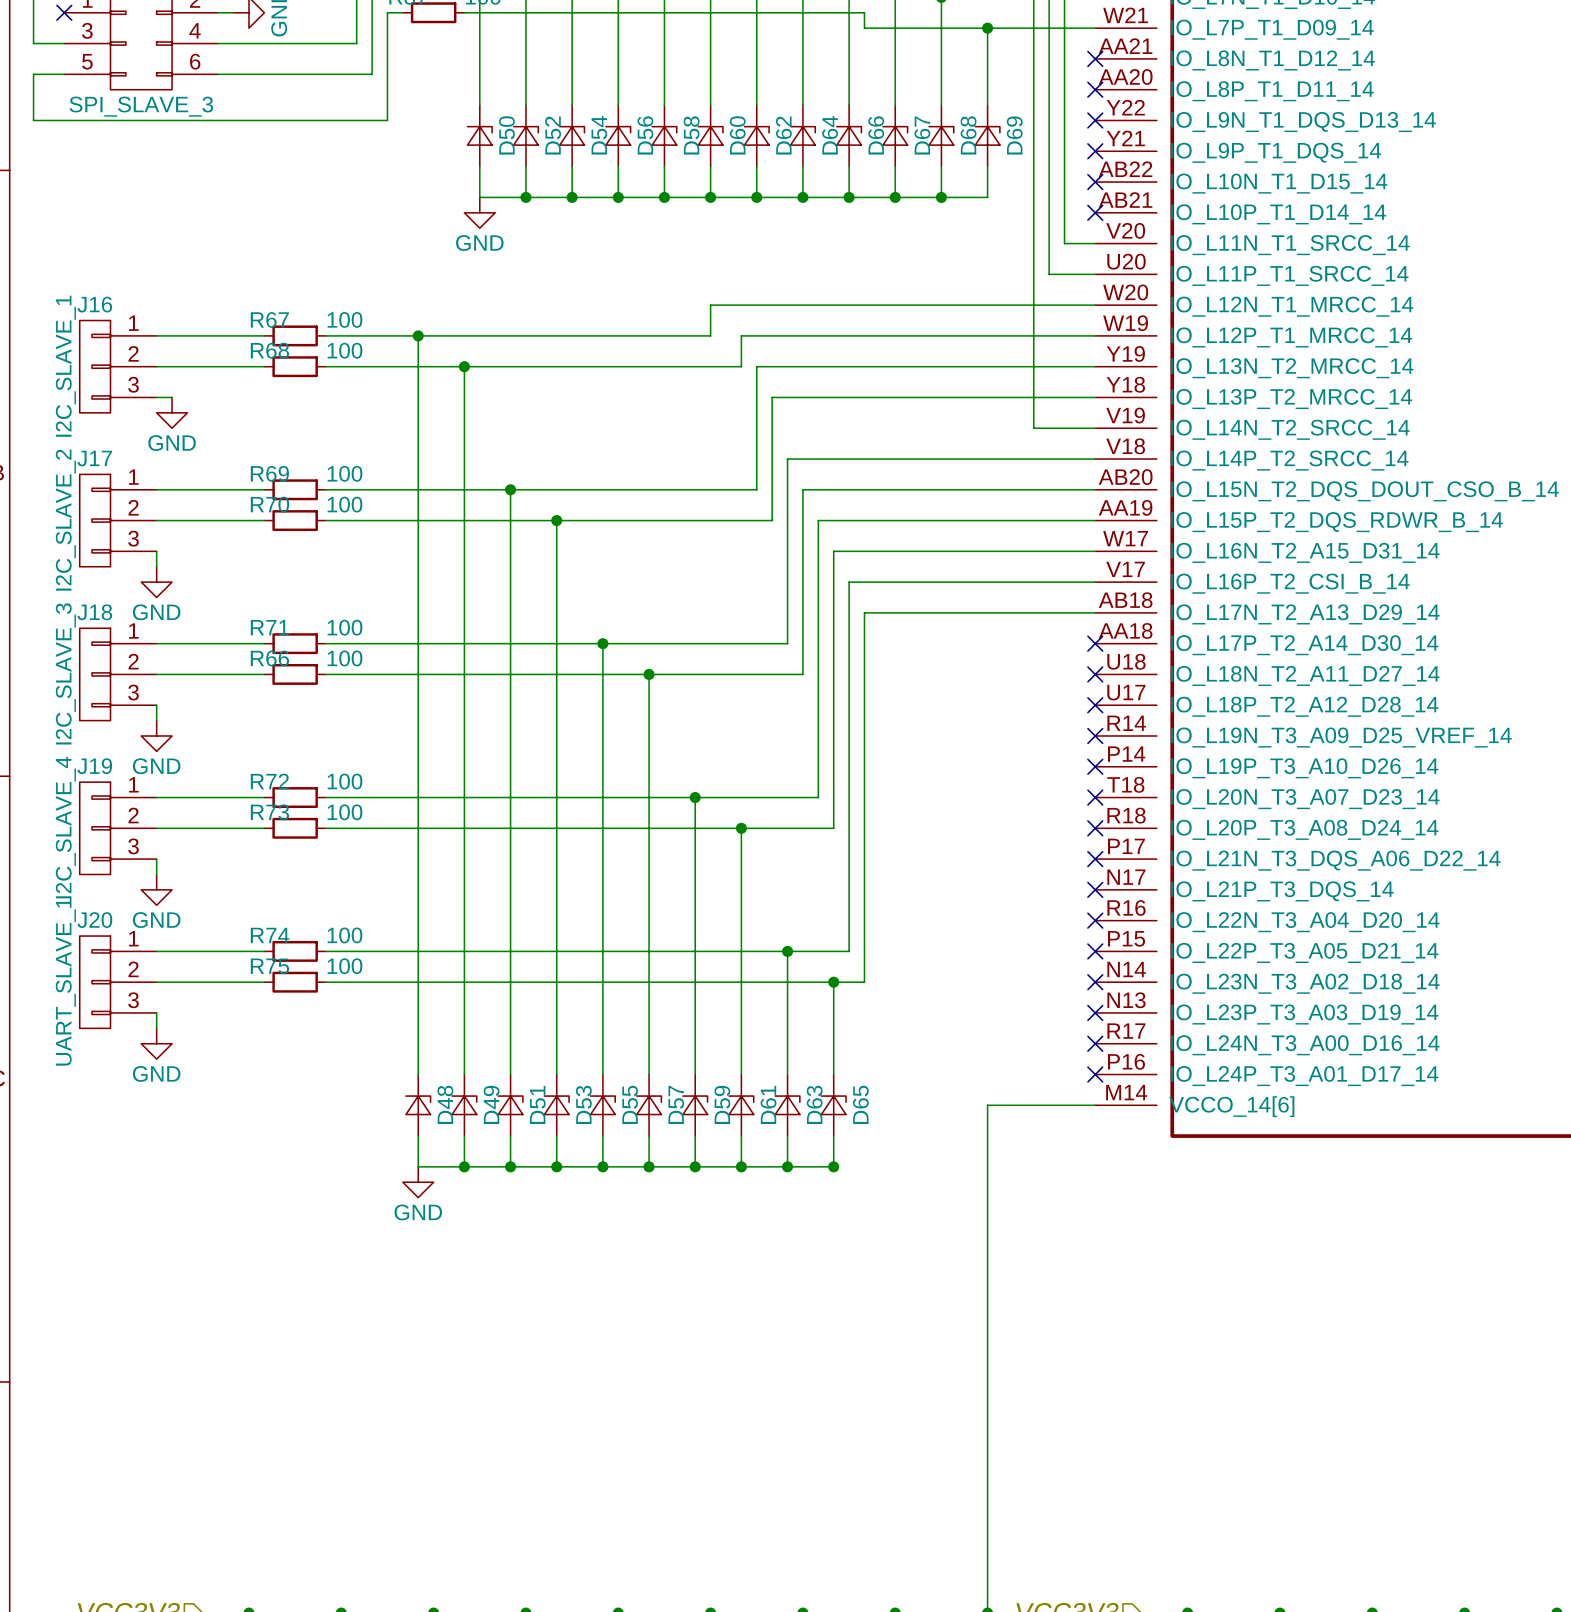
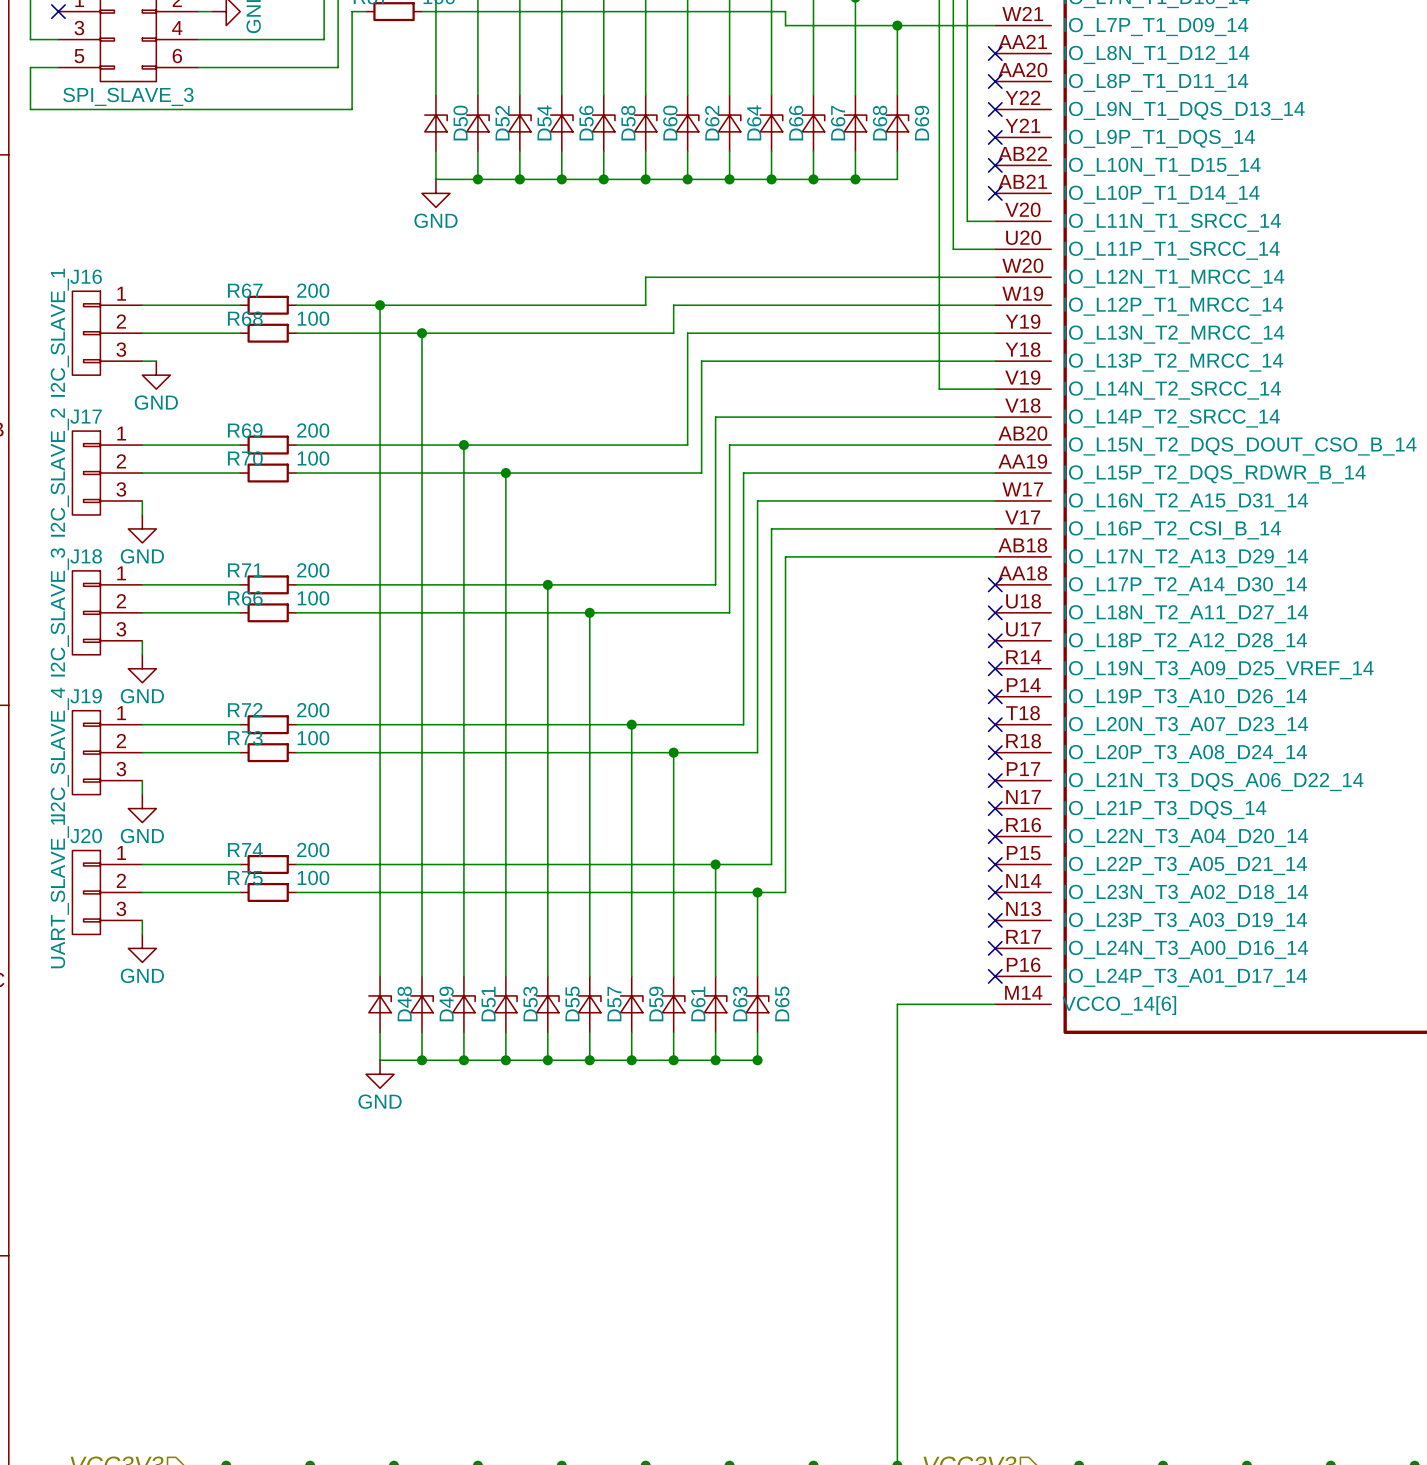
R67 value: 100 (344, 319) -> 200 (313, 290)
R69 value: 100 (344, 473) -> 200 (313, 430)
R71 value: 100 (344, 627) -> 200 (313, 570)
R72 value: 100 (344, 781) -> 200 (313, 710)
R74 value: 100 (344, 935) -> 200 (313, 850)

